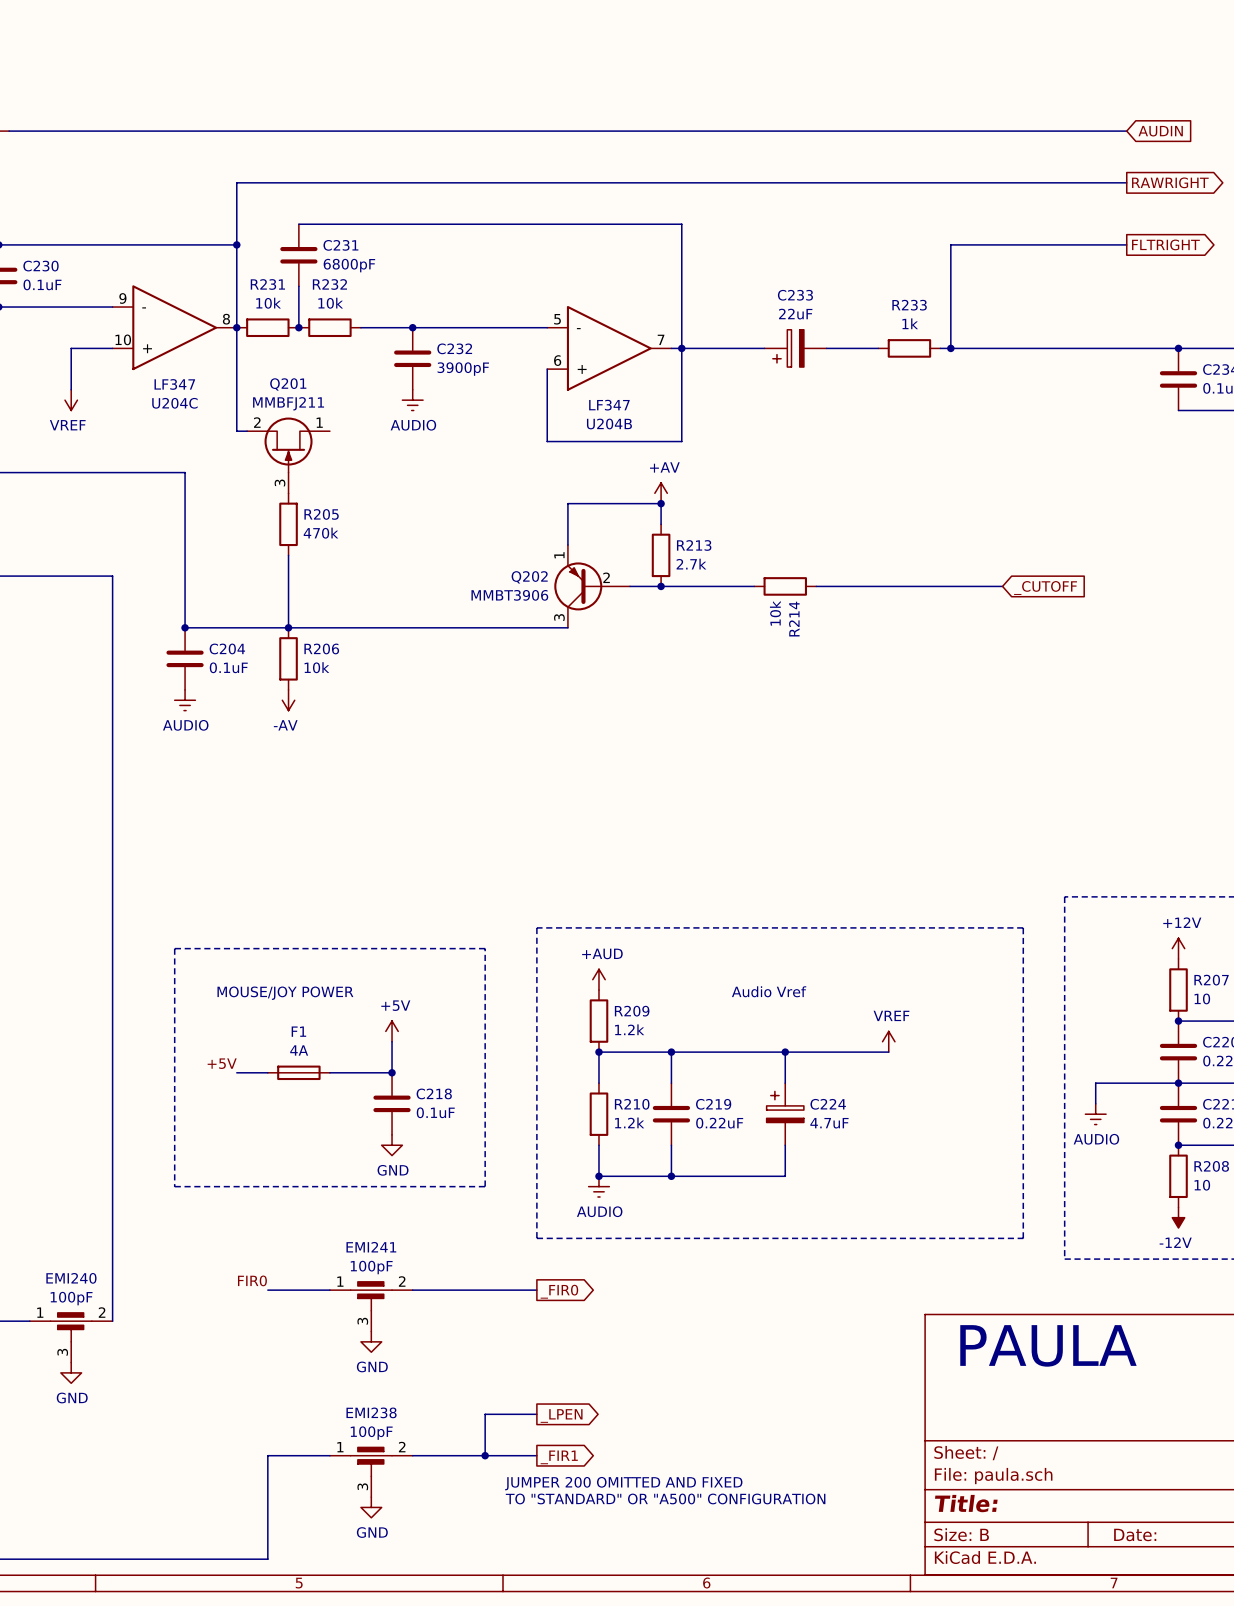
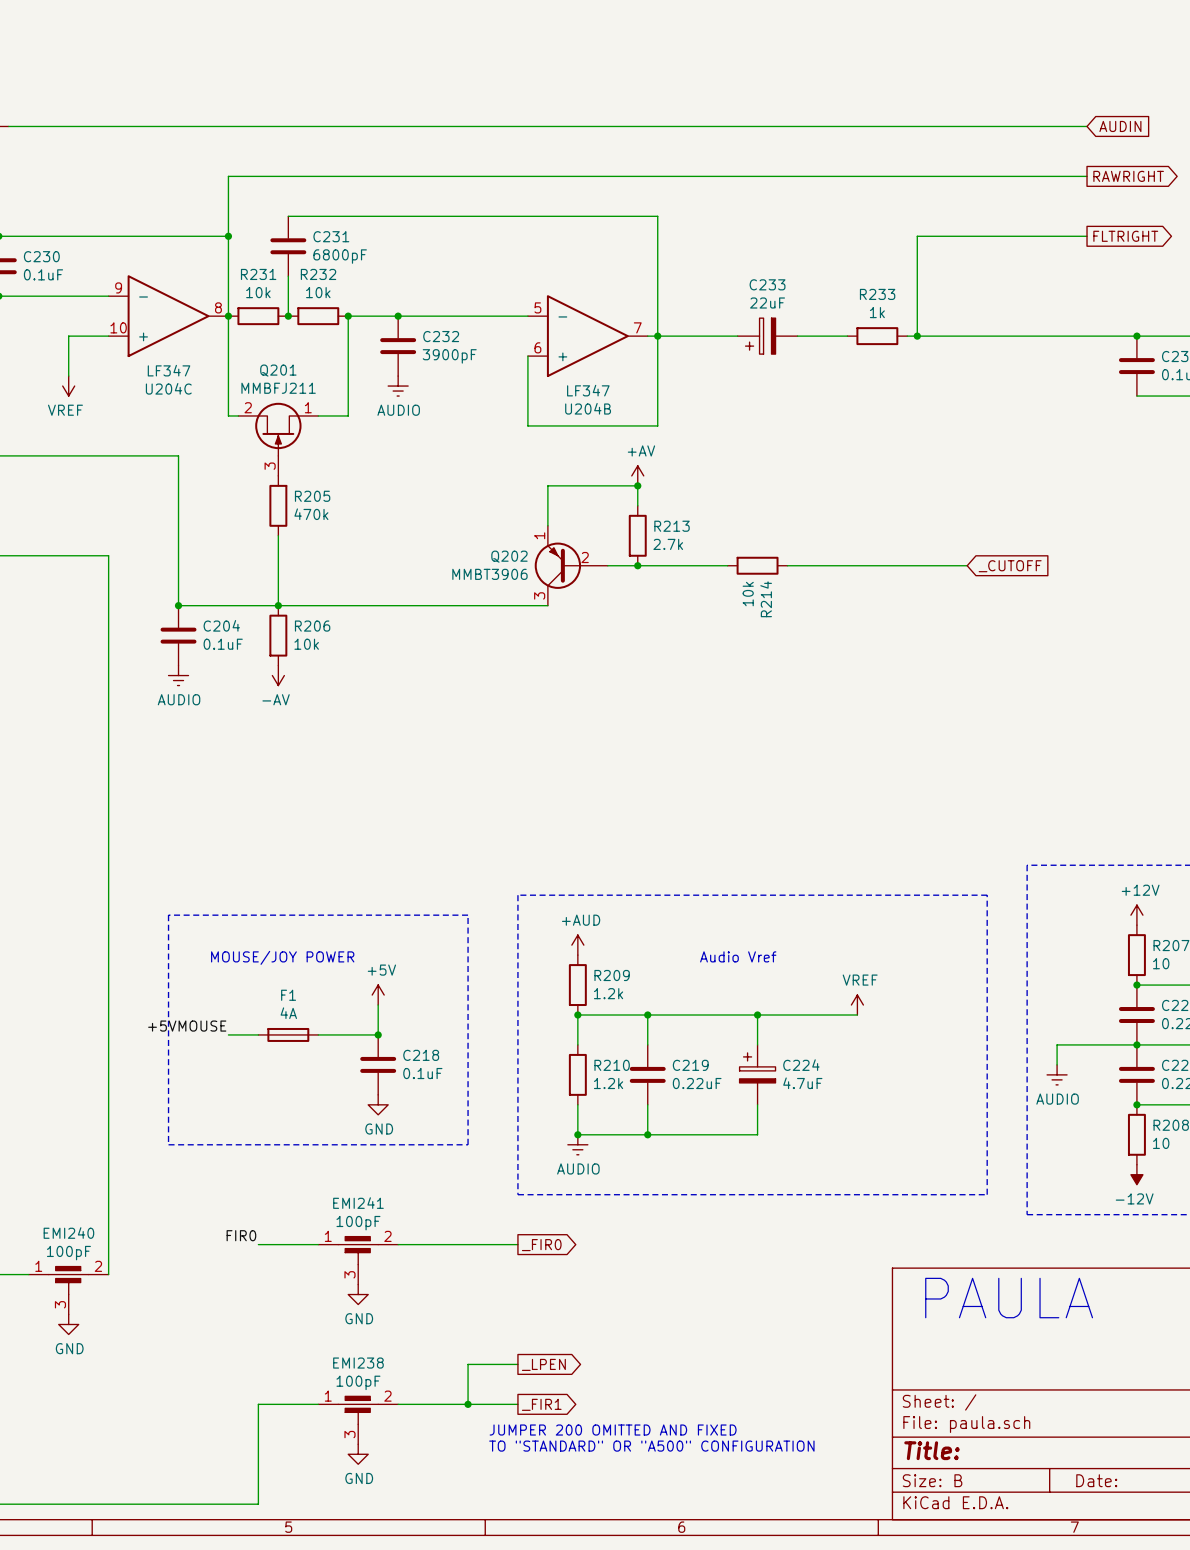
wire: none -> (348, 316) (348, 415) (318, 415)
junction: none -> (348, 316)
label: +5V (222, 1063) -> +5VMOUSE (187, 1026)

